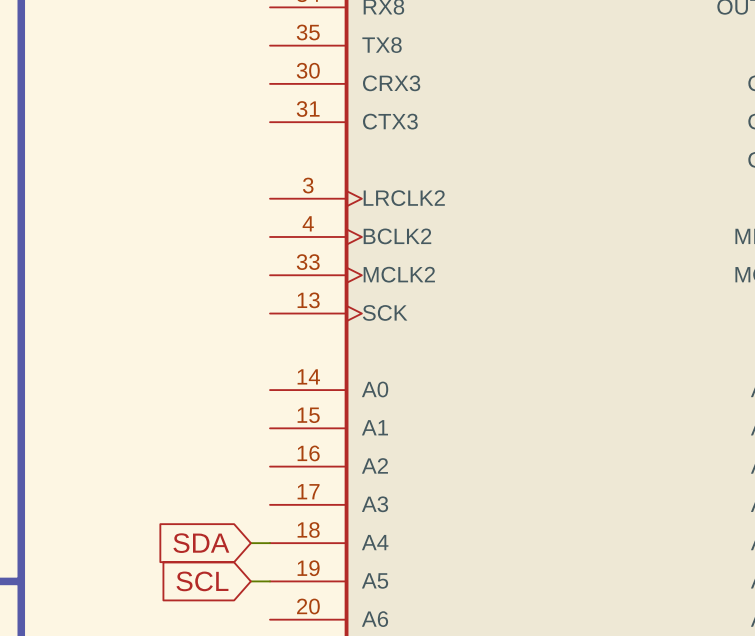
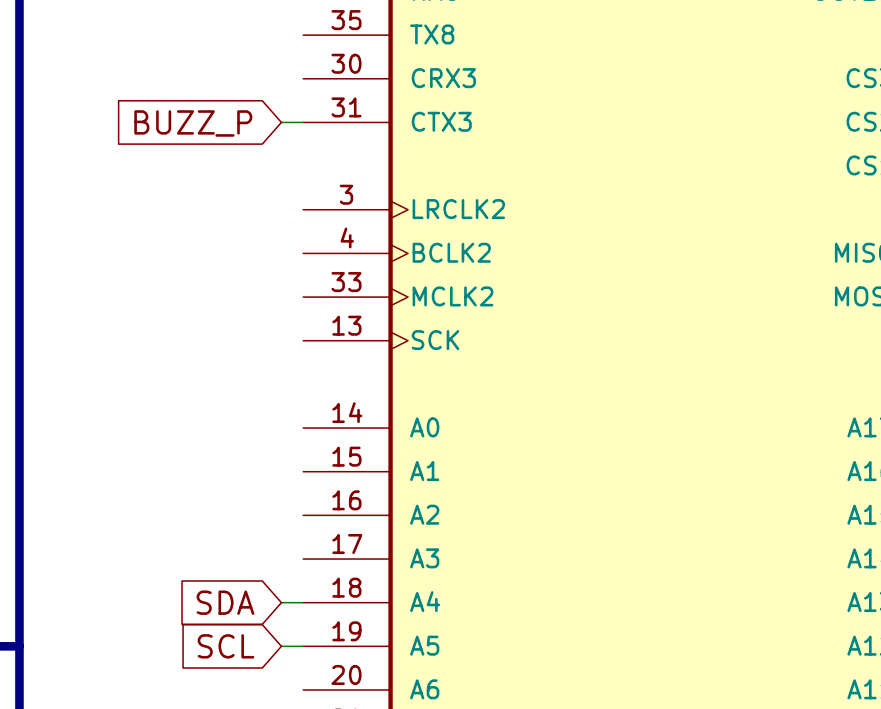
wire: none -> (281, 122) (303, 122)
global label: none -> BUZZ_P (193, 123)

